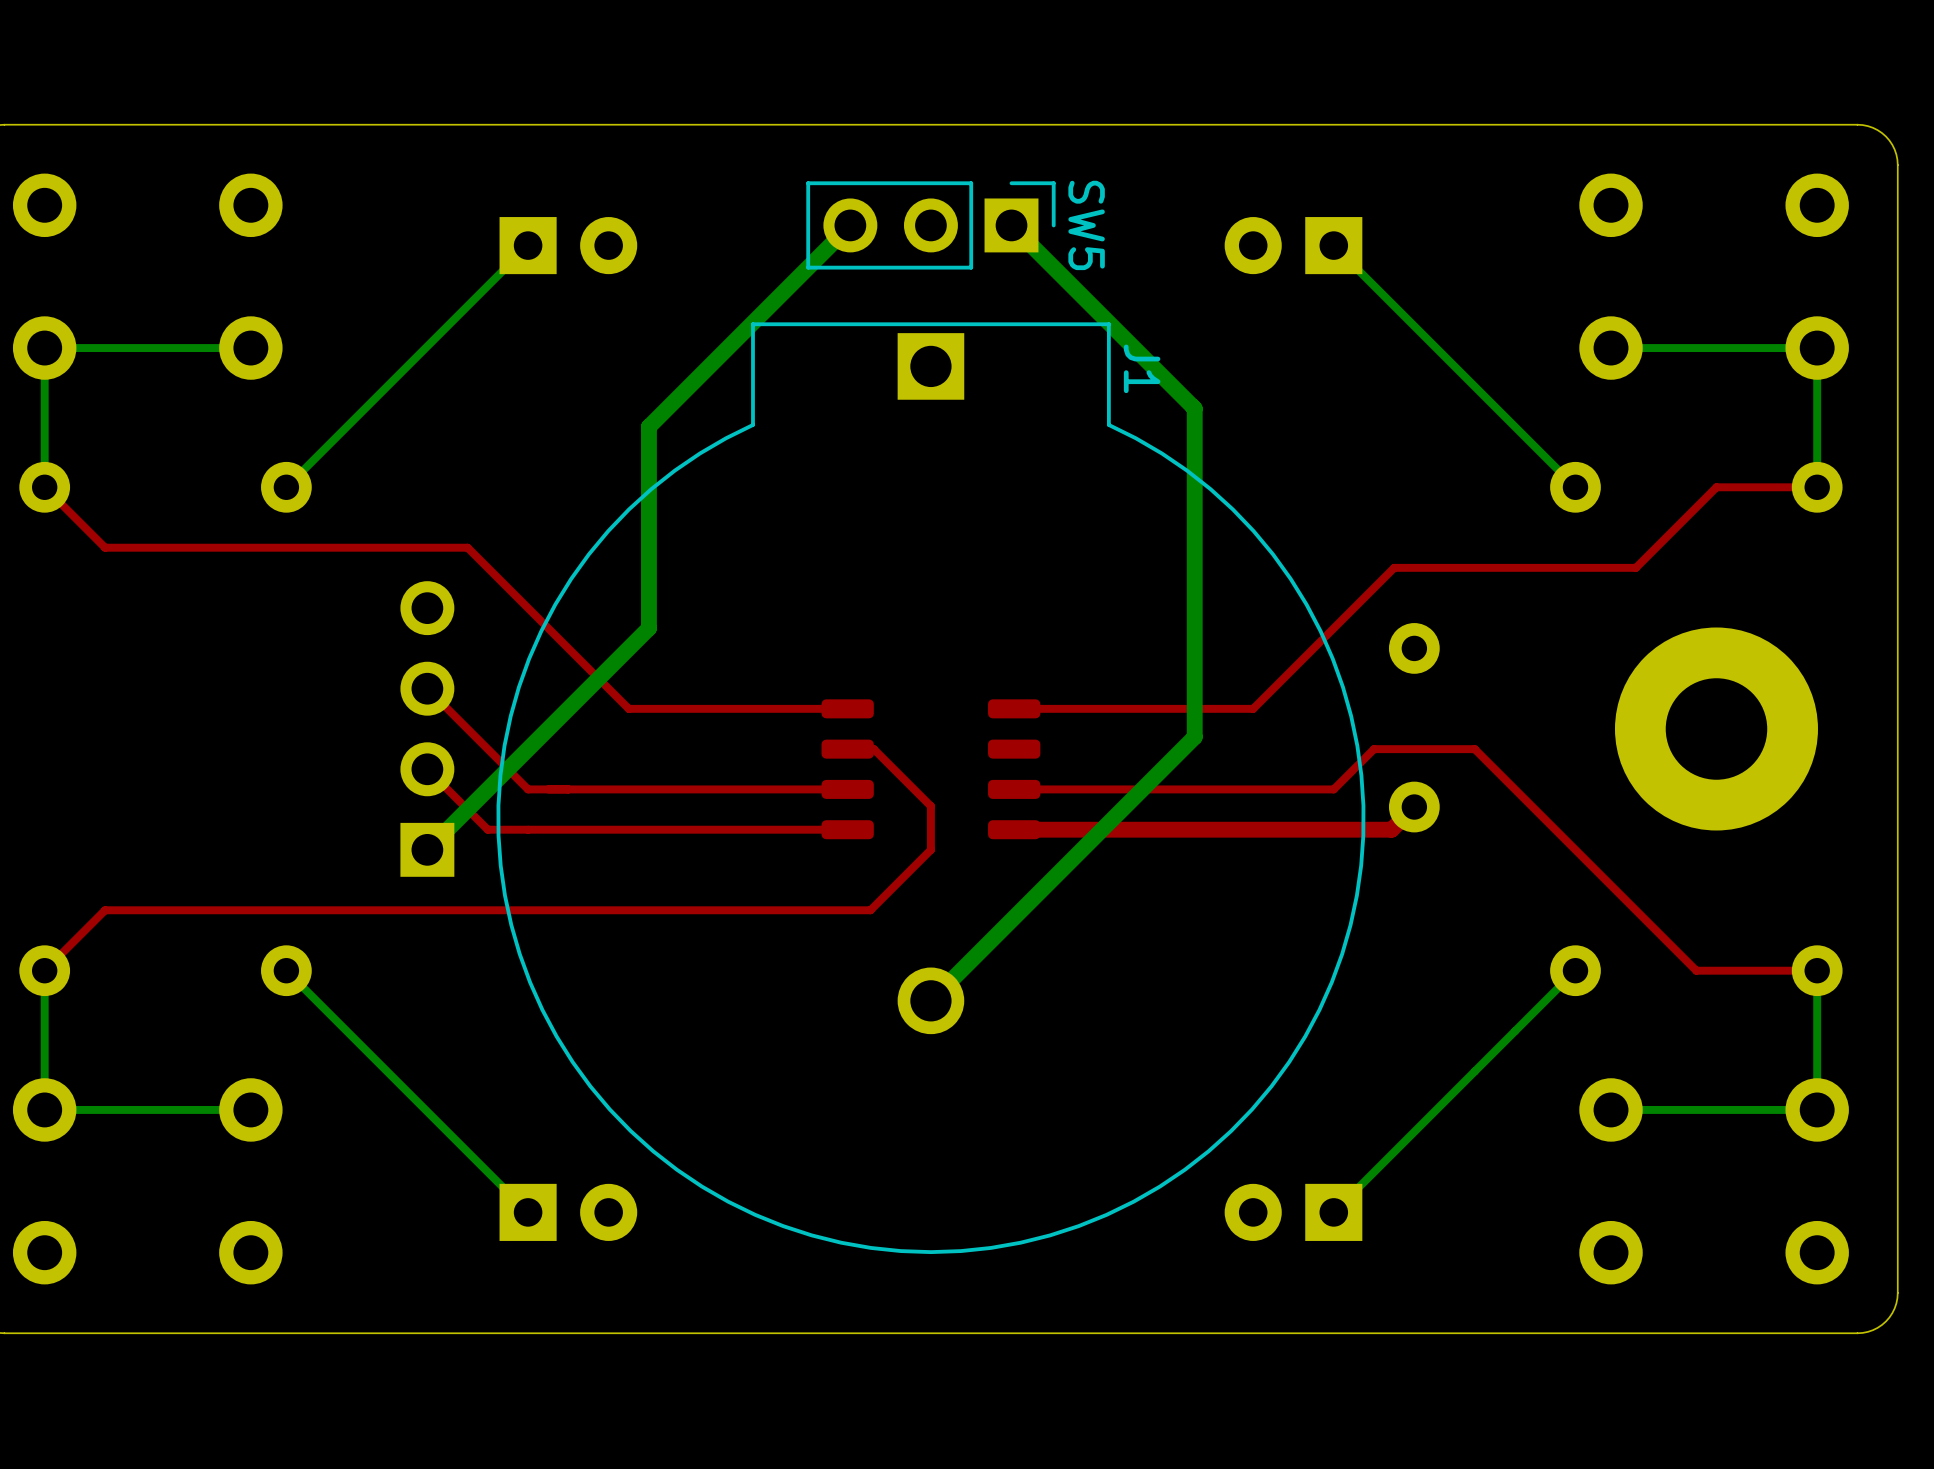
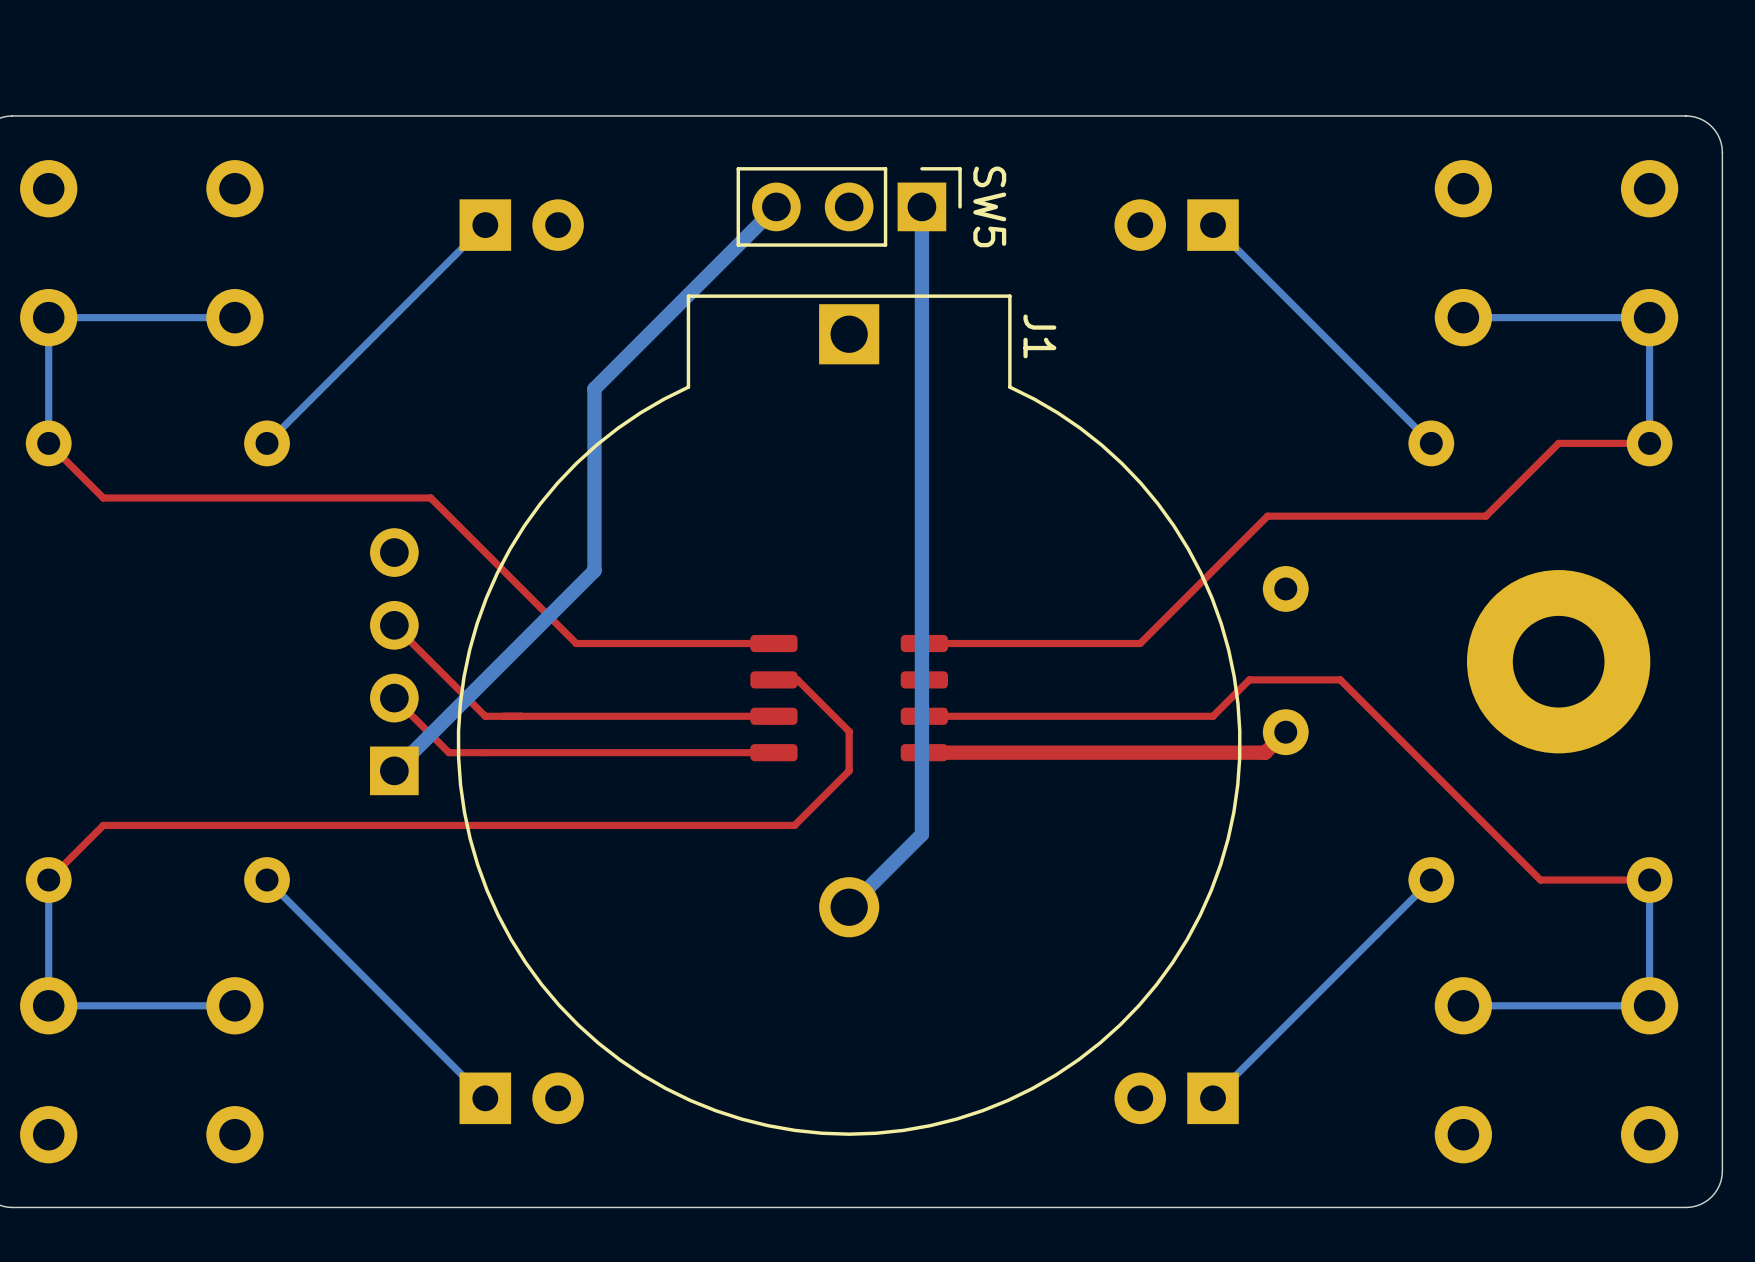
bottom track: (1011, 225) (1194, 408) (1194, 737) (1011, 920) -> (921, 206) (921, 834)

